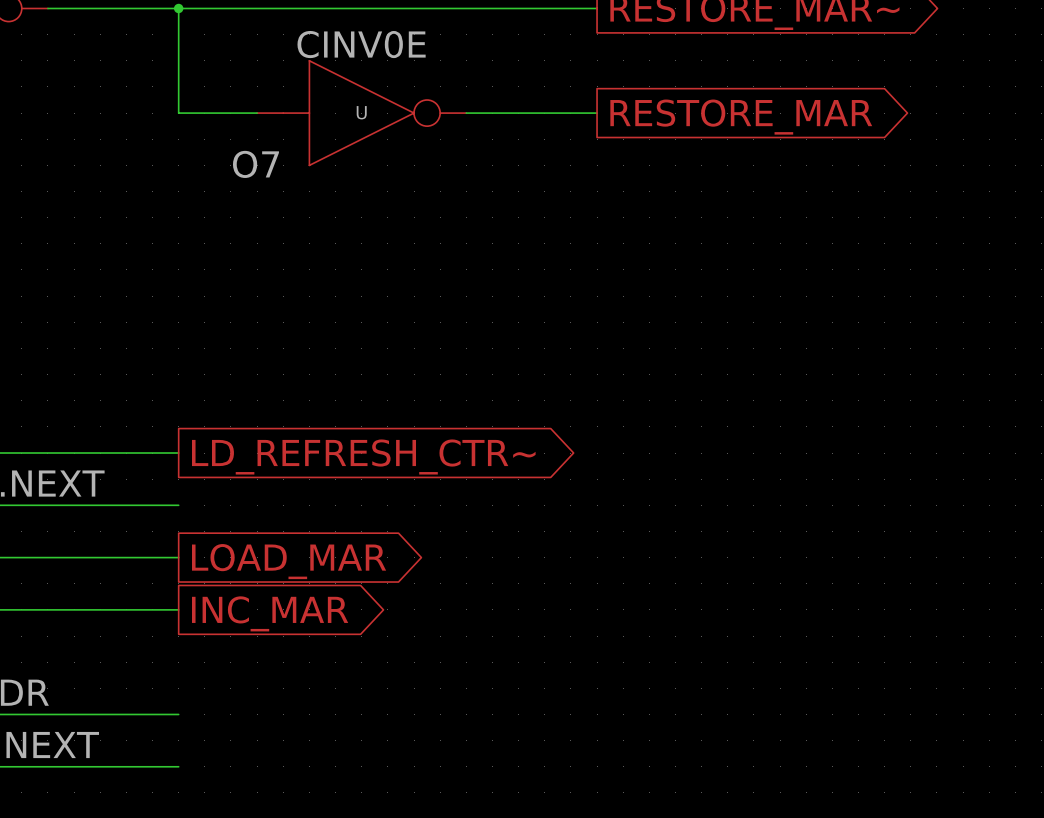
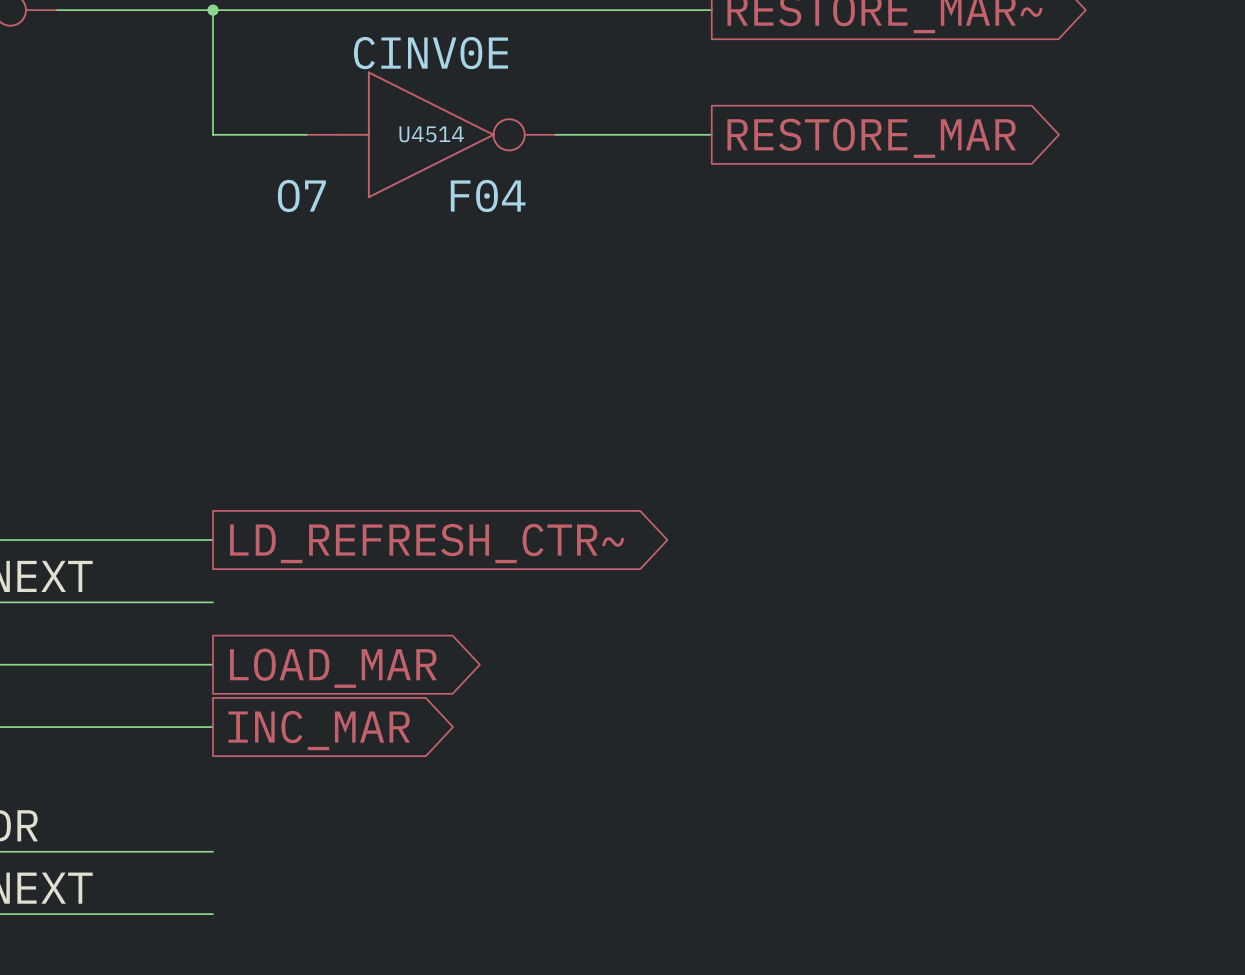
U name: U (361, 112) -> U4514 (431, 134)
U value: none -> F04 (488, 195)

